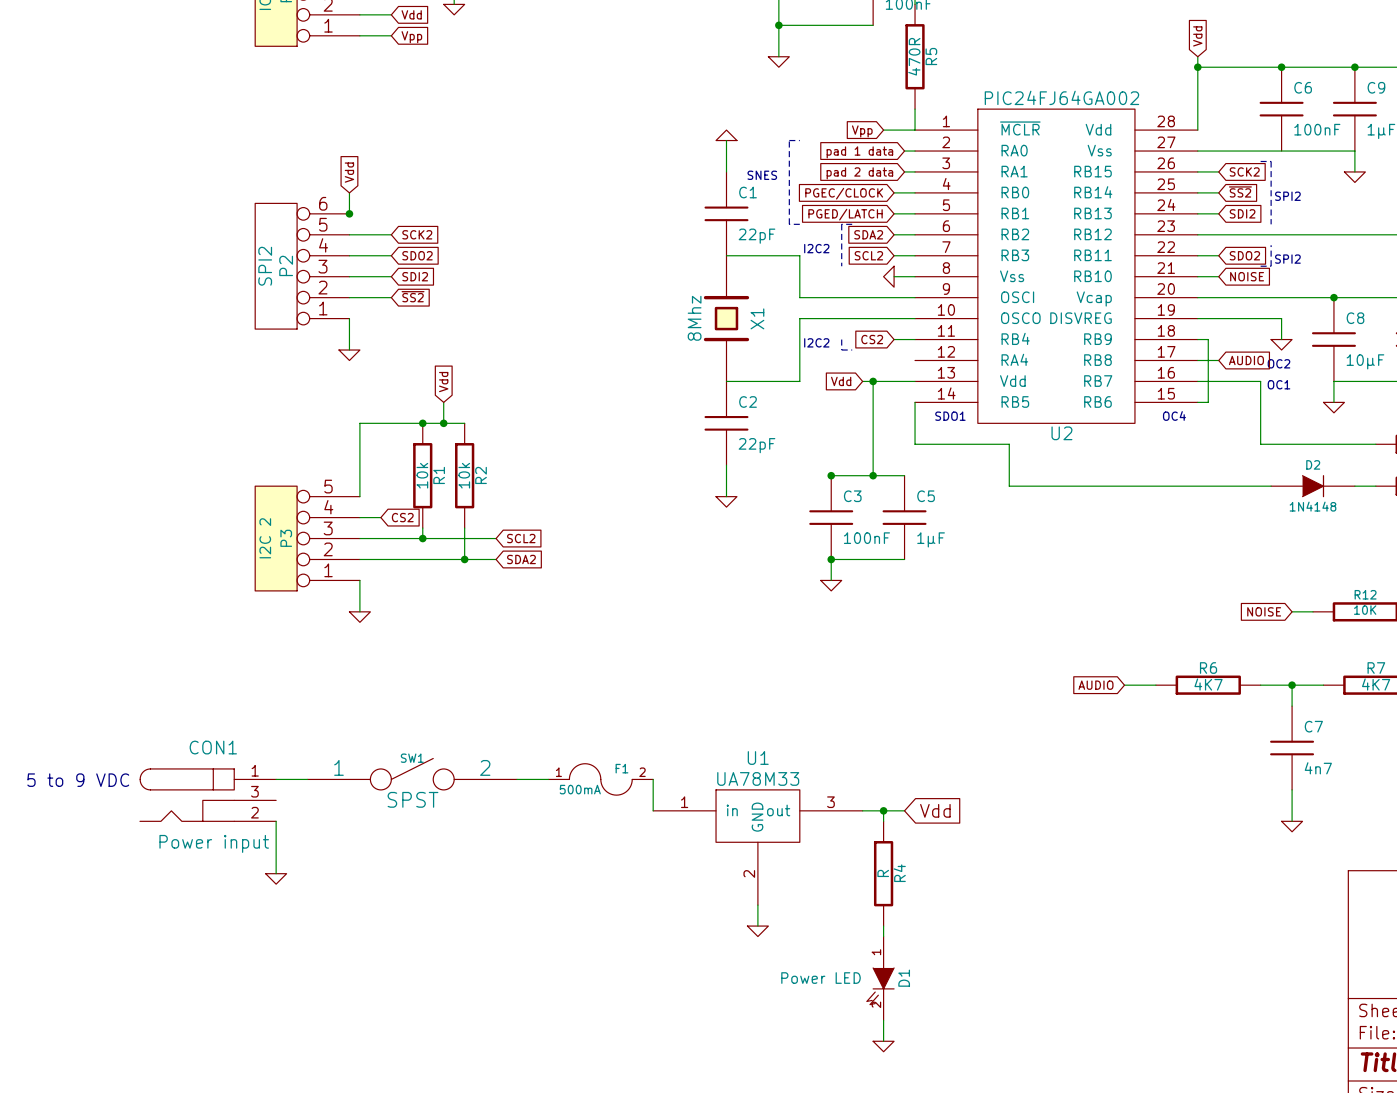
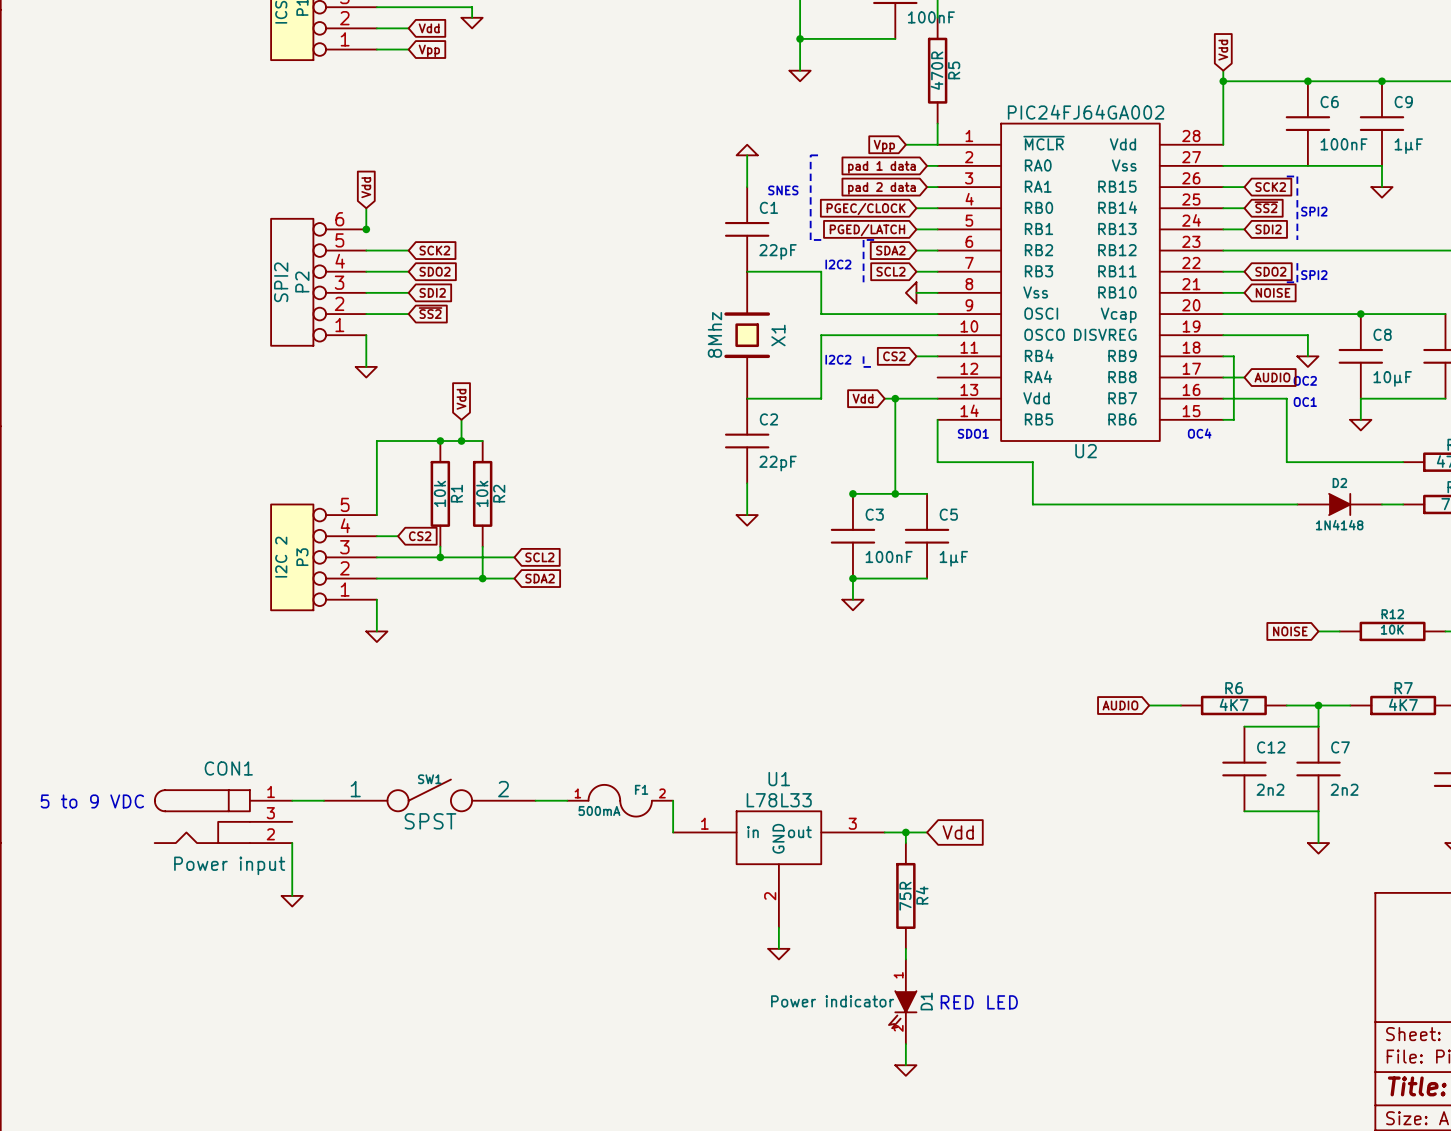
wire: none -> (1244, 726) (1318, 726)
C12: none -> 2n2 (1244, 768)
C7 value: 4n7 (1318, 768) -> 2n2 (1344, 789)
U1 value: UA78M33 (758, 778) -> L78L33 (779, 800)
wire: none -> (1244, 811) (1318, 811)
R4 value: R (883, 873) -> 75R (905, 896)
D1 value: Power LED (821, 978) -> Power indicator (832, 1001)
text: none -> RED LED (979, 1002)

